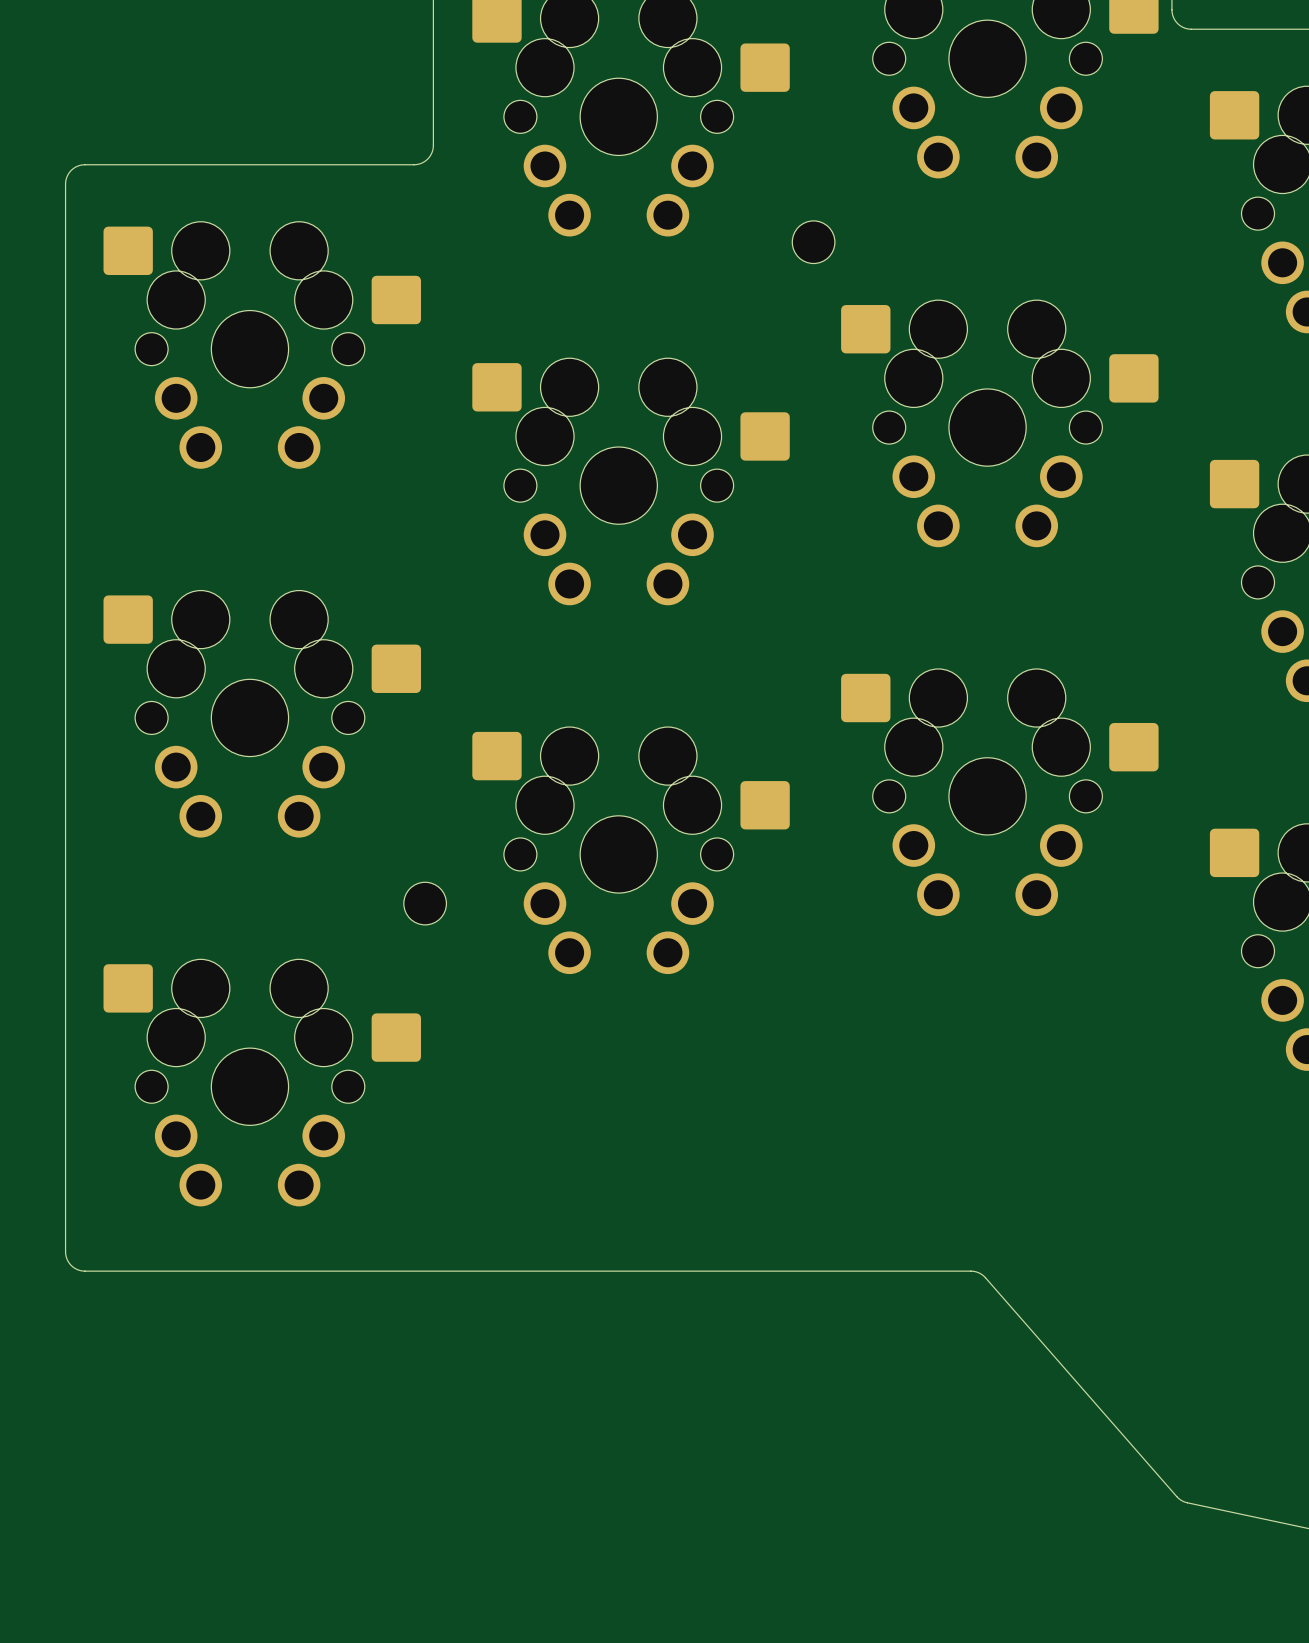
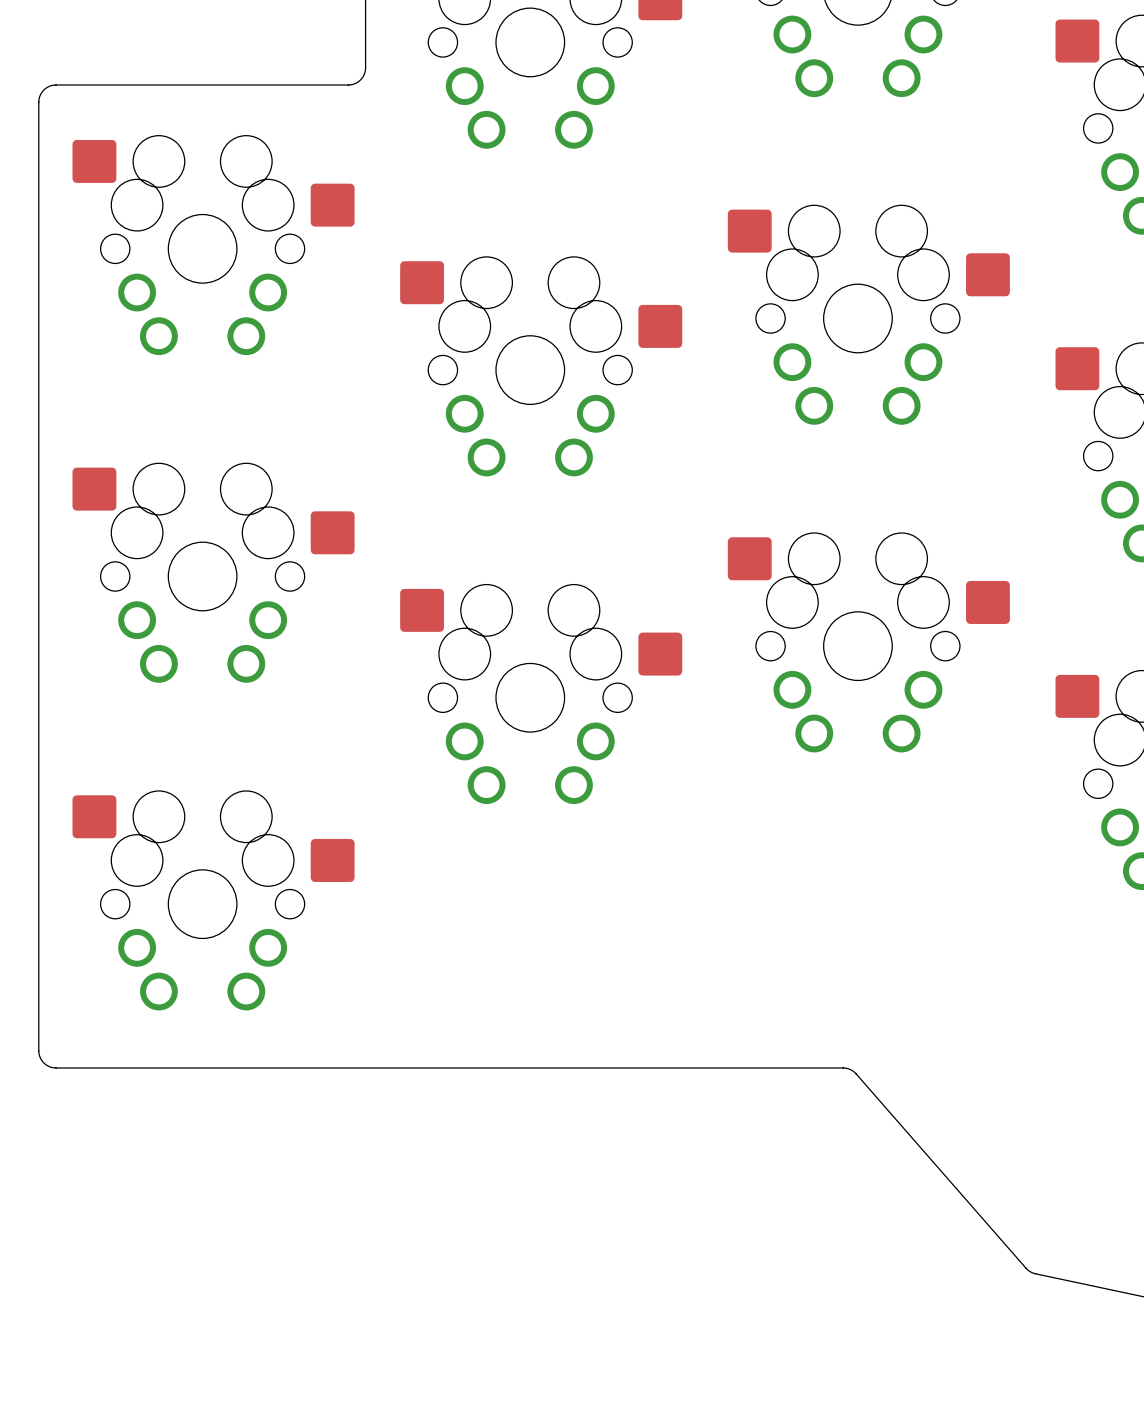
part: (813, 242) -> none
part: (425, 903) -> none

